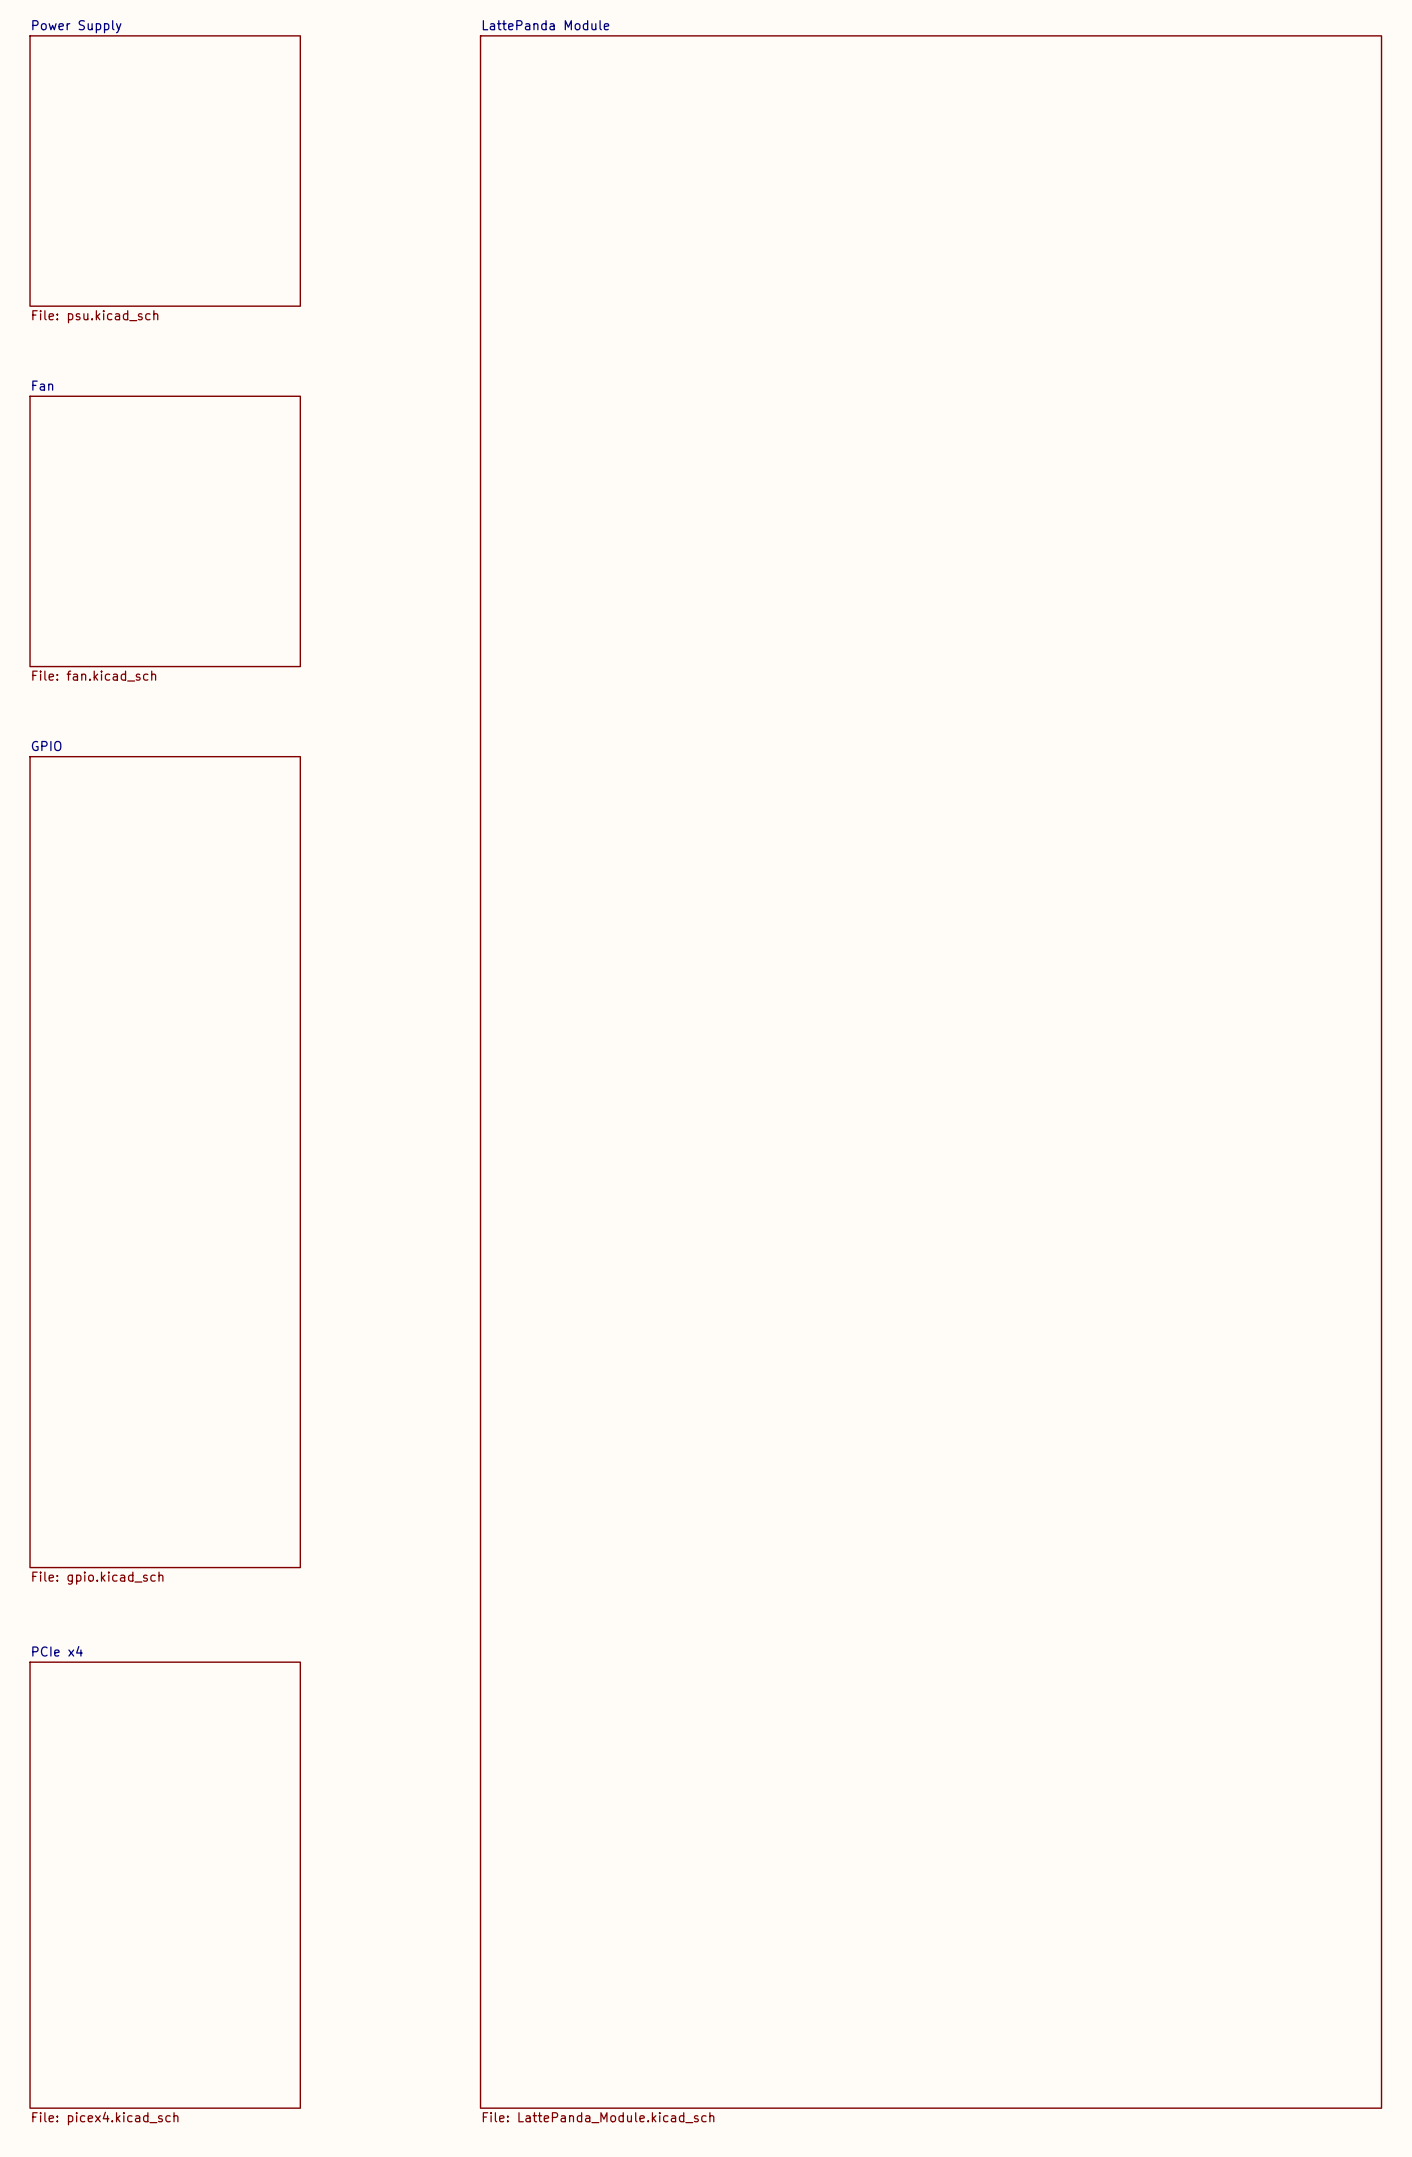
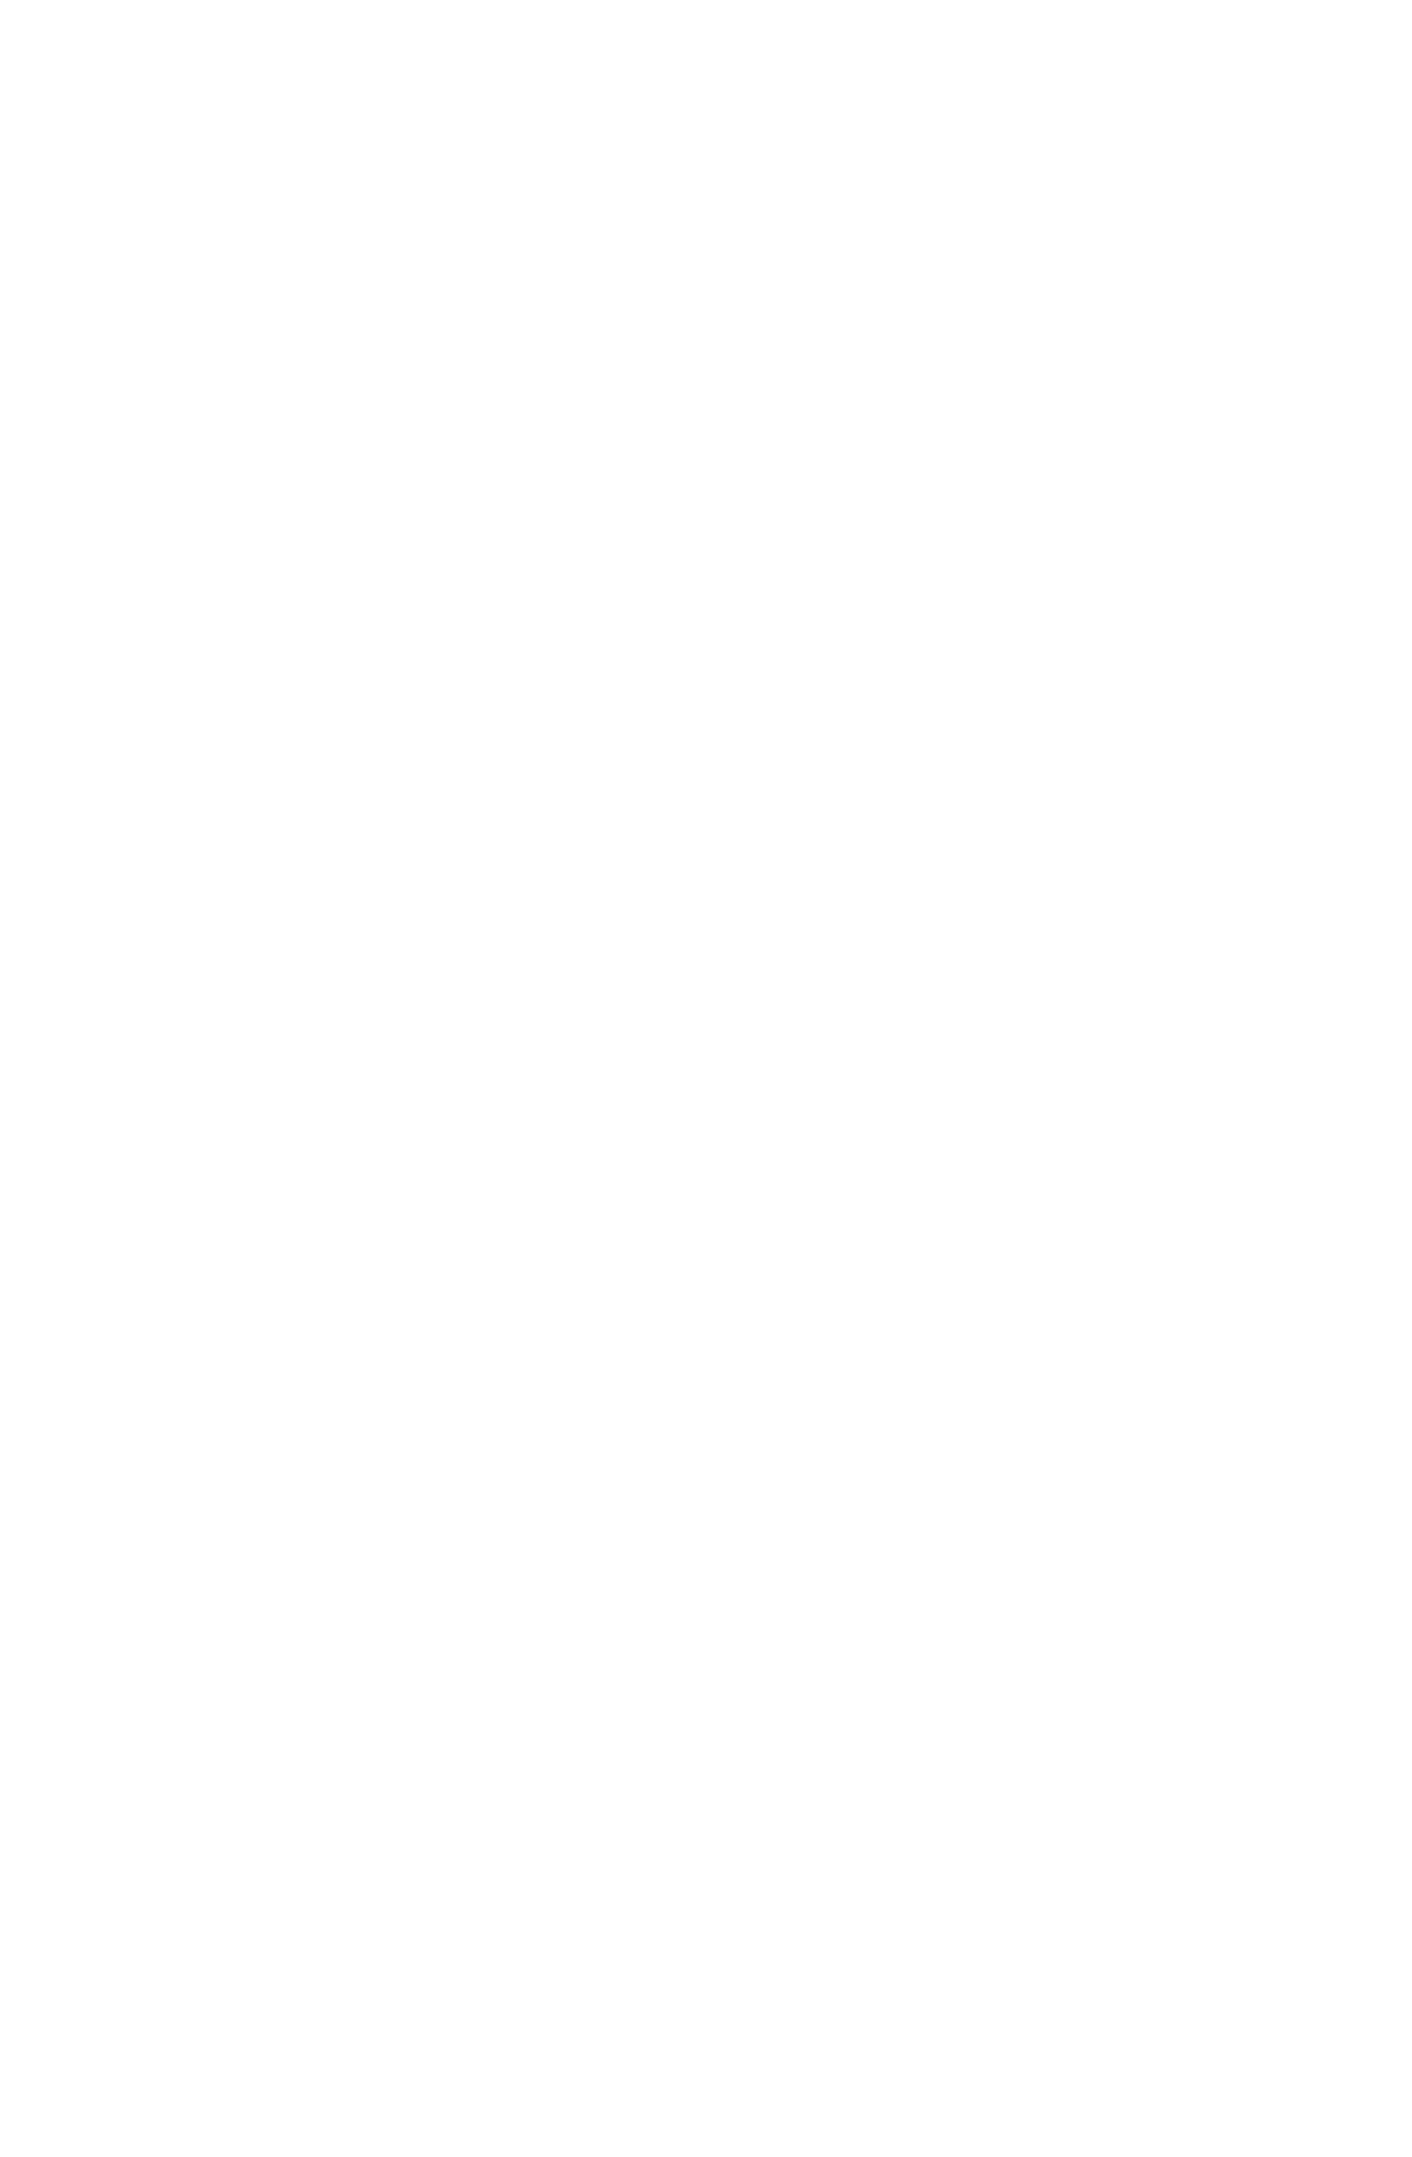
sheet Power Supply: File: psu.kicad_sch (165, 171) -> none
sheet Fan: File: fan.kicad_sch (165, 531) -> none
sheet LattePanda Module: File: LattePanda_Module.kicad_sch (931, 1072) -> none
sheet GPIO: File: gpio.kicad_sch (165, 1162) -> none
sheet PCIe x4: File: picex4.kicad_sch (165, 1885) -> none

